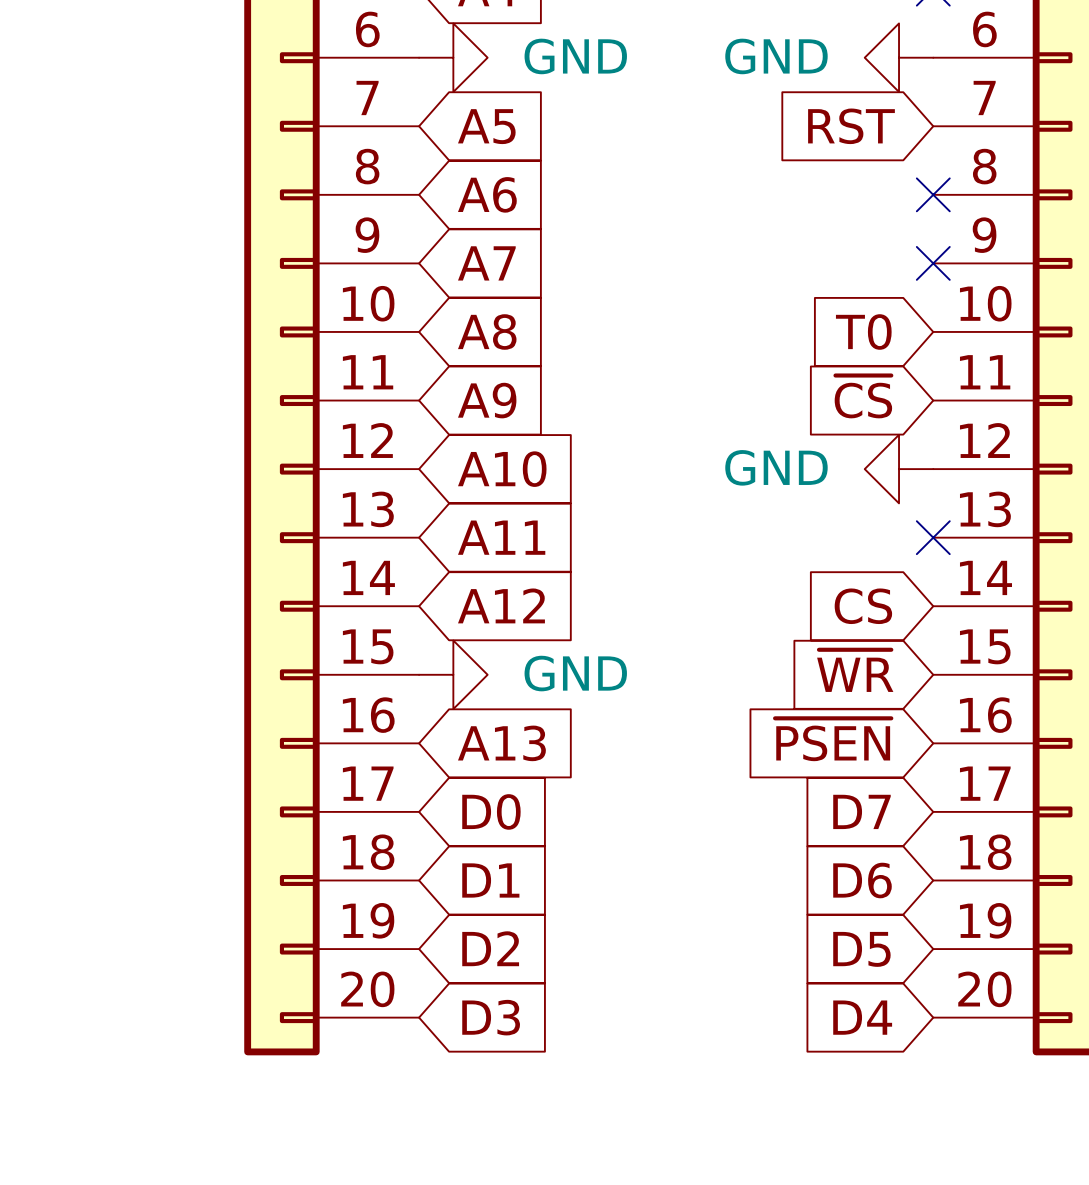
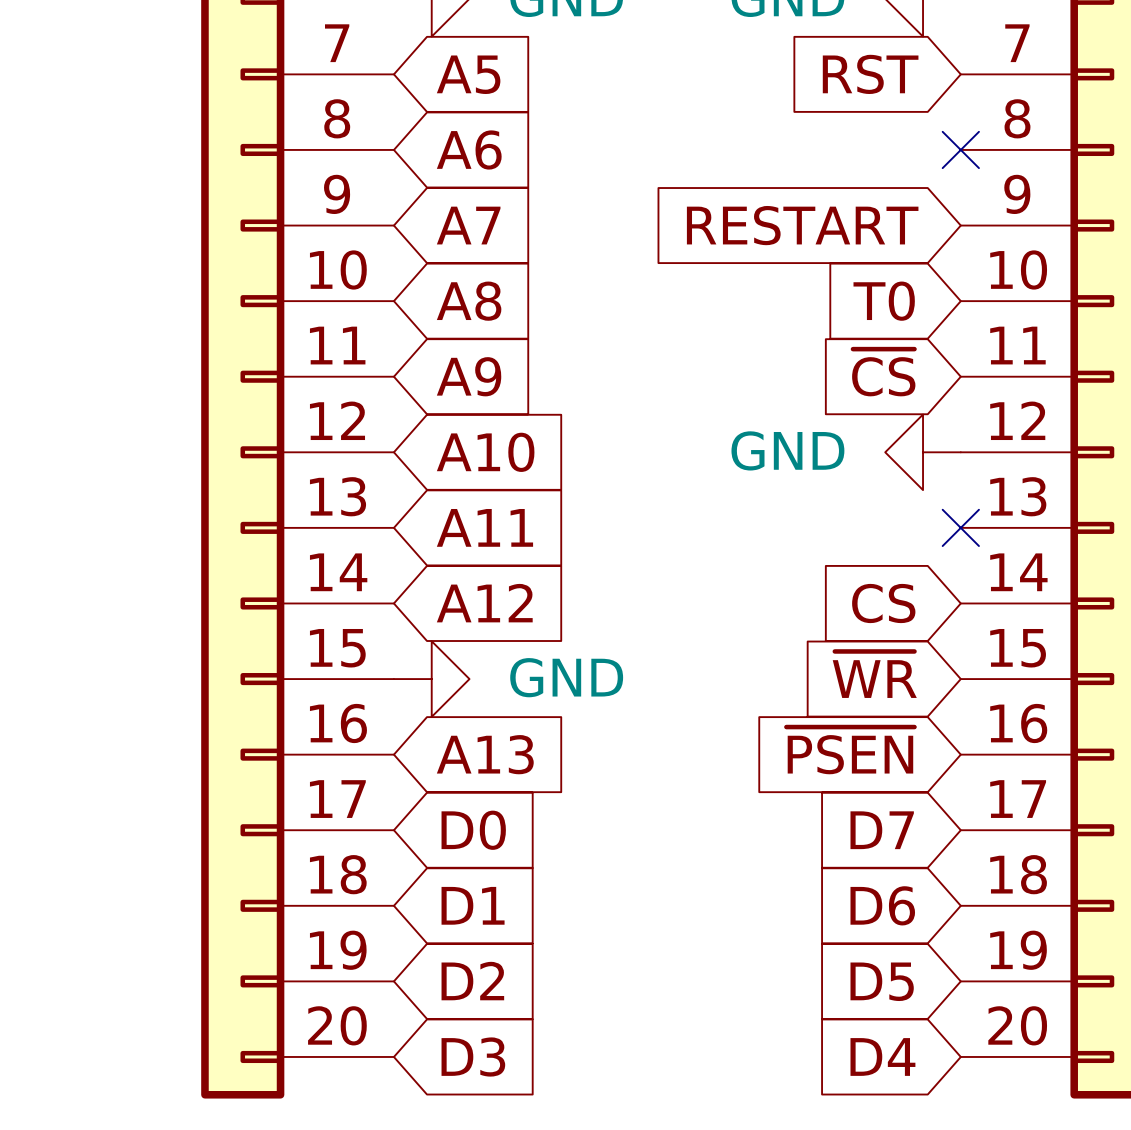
global label: none -> RESTART (802, 225)
no-connect mark: (933, 263) -> none

